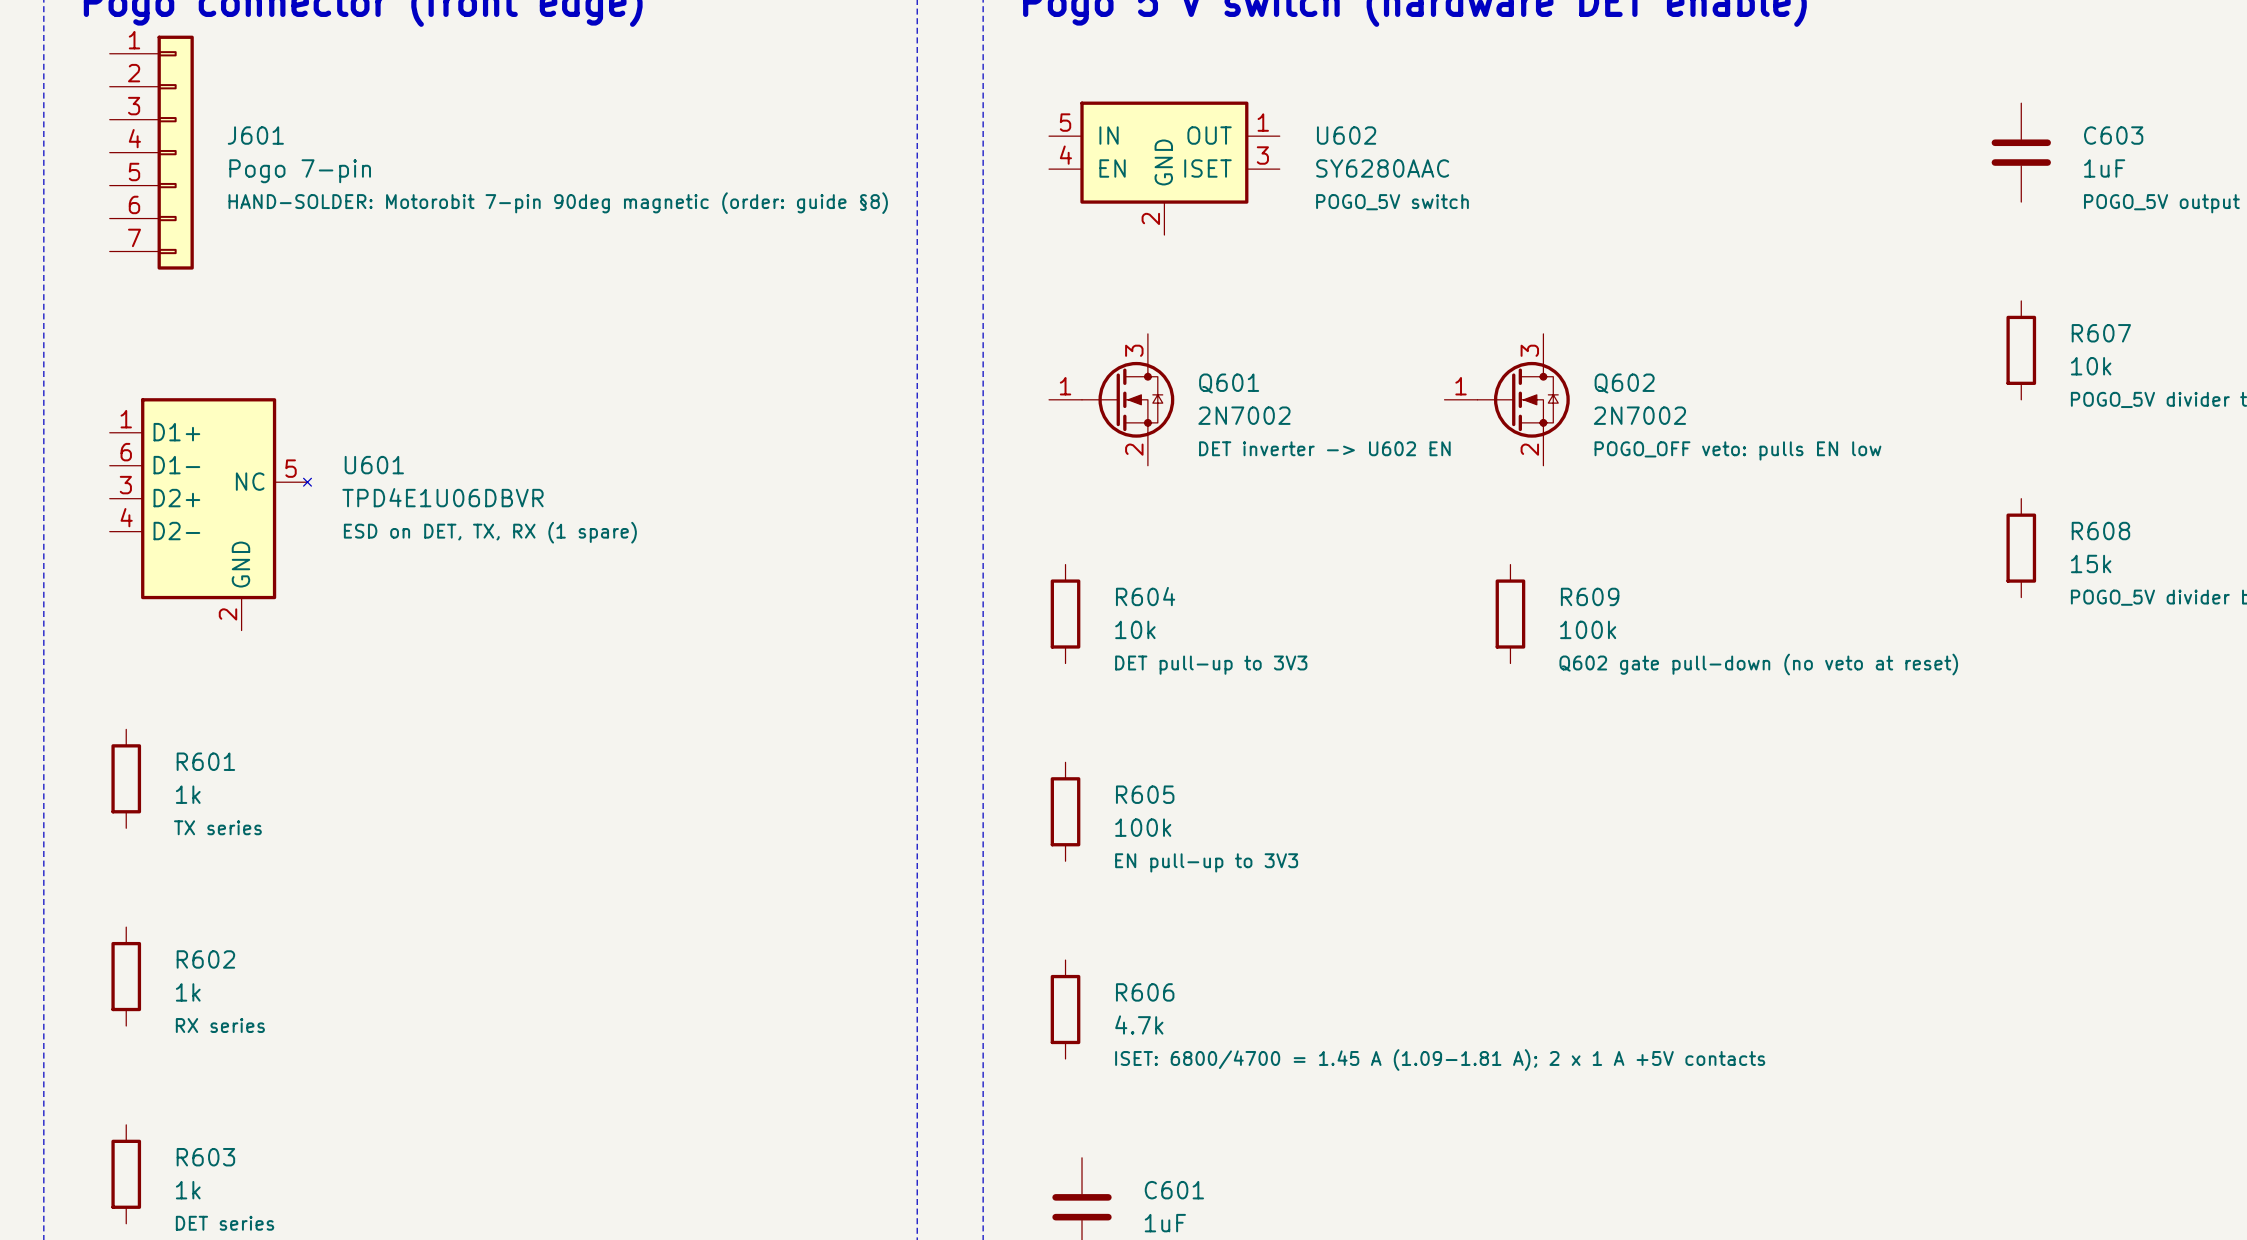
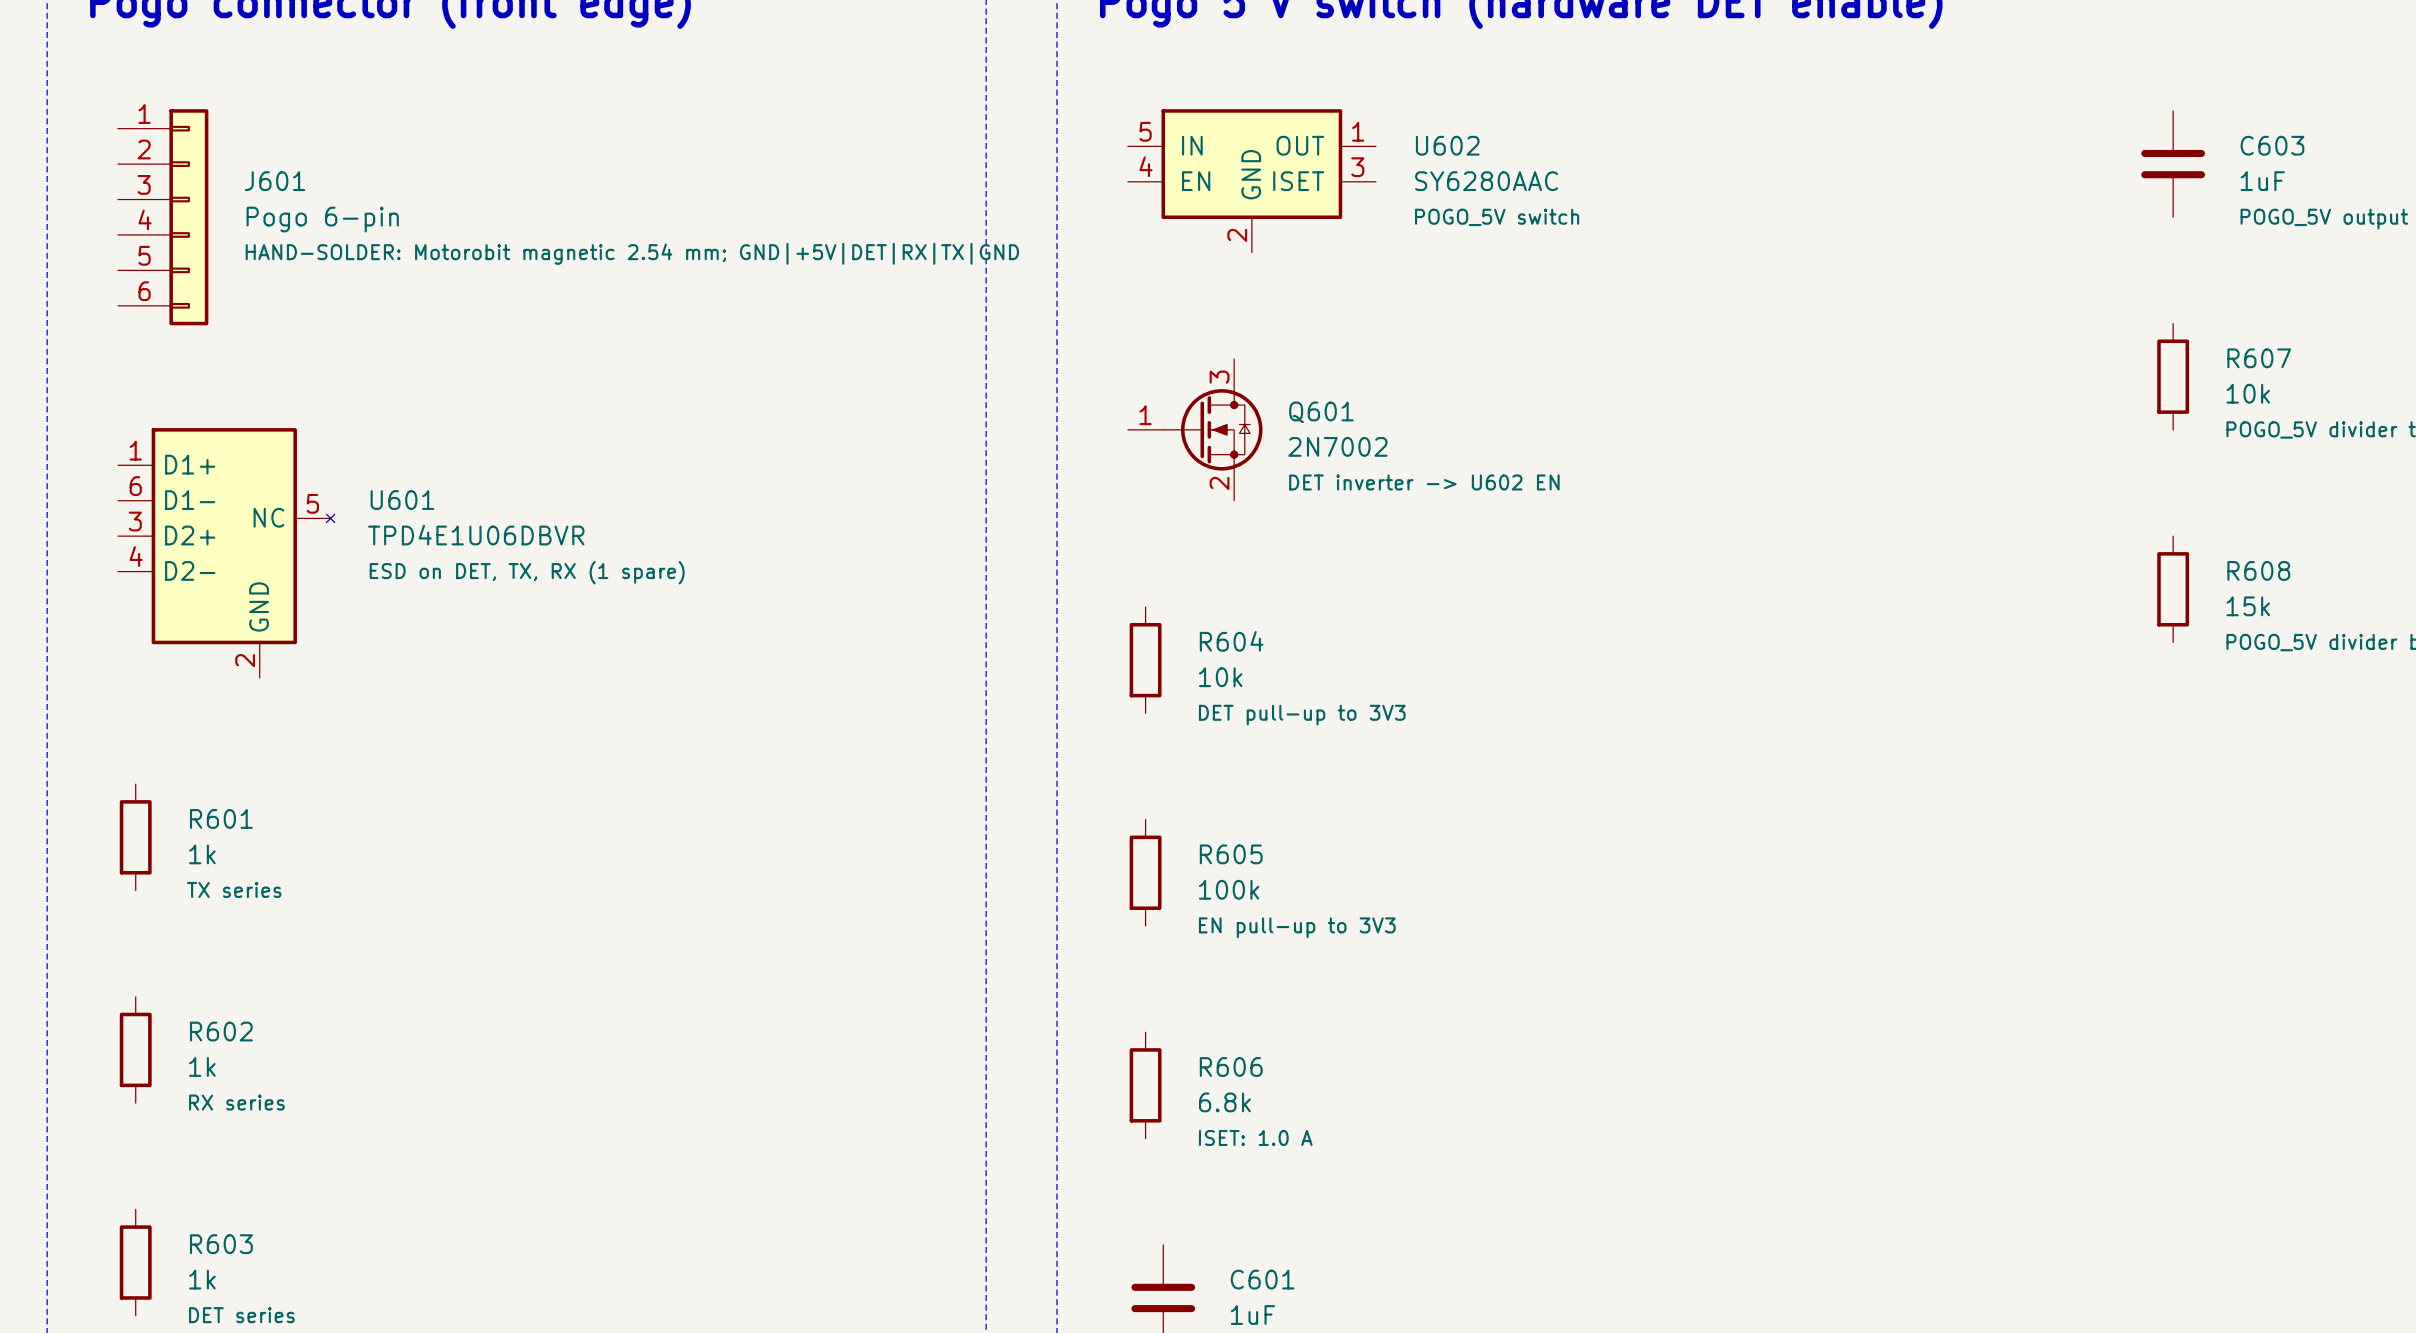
J601 symbol: [109, 35, 194, 270] -> [118, 109, 209, 326]
J601 value: Pogo 7-pin (300, 171) -> Pogo 6-pin (322, 219)
J601 text: HAND-SOLDER: Motorobit 7-pin 90deg magnetic (order: guide §8) (558, 203) -> HAND-SOLDER: Motorobit magnetic 2.54 mm; GND|+5V|DET|RX|TX|GND (632, 253)
Q602: 2N7002 (1507, 399) -> none
R609: 100k (1510, 614) -> none
R606 value: 4.7k (1139, 1024) -> 6.8k (1224, 1102)
R606 text: ISET: 6800/4700 = 1.45 A (1.09-1.81 A); 2 x 1 A +5V contacts (1440, 1060) -> ISET: 1.0 A (1255, 1137)

